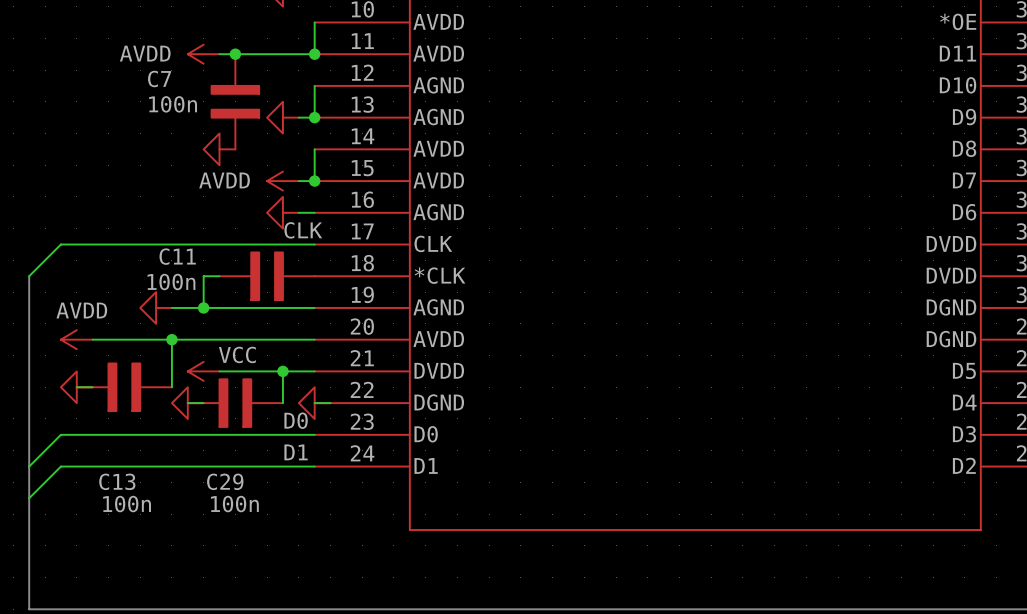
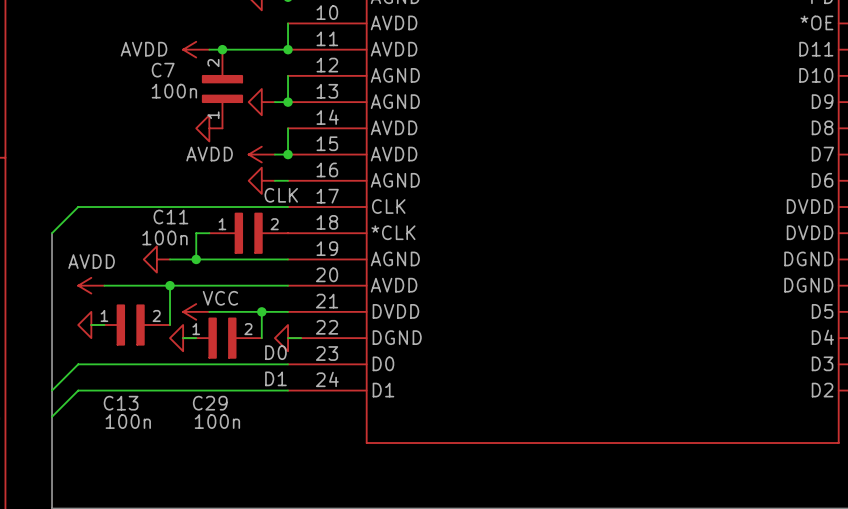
C7 pin number: none -> 2 (213, 63)
C7 pin number: none -> 1 (213, 115)
C11 pin number: none -> 1 (222, 224)
C11 pin number: none -> 2 (274, 224)
C13 pin number: none -> 1 (104, 315)
C13 pin number: none -> 2 (156, 315)
C29 pin number: none -> 1 (196, 329)
C29 pin number: none -> 2 (248, 329)

